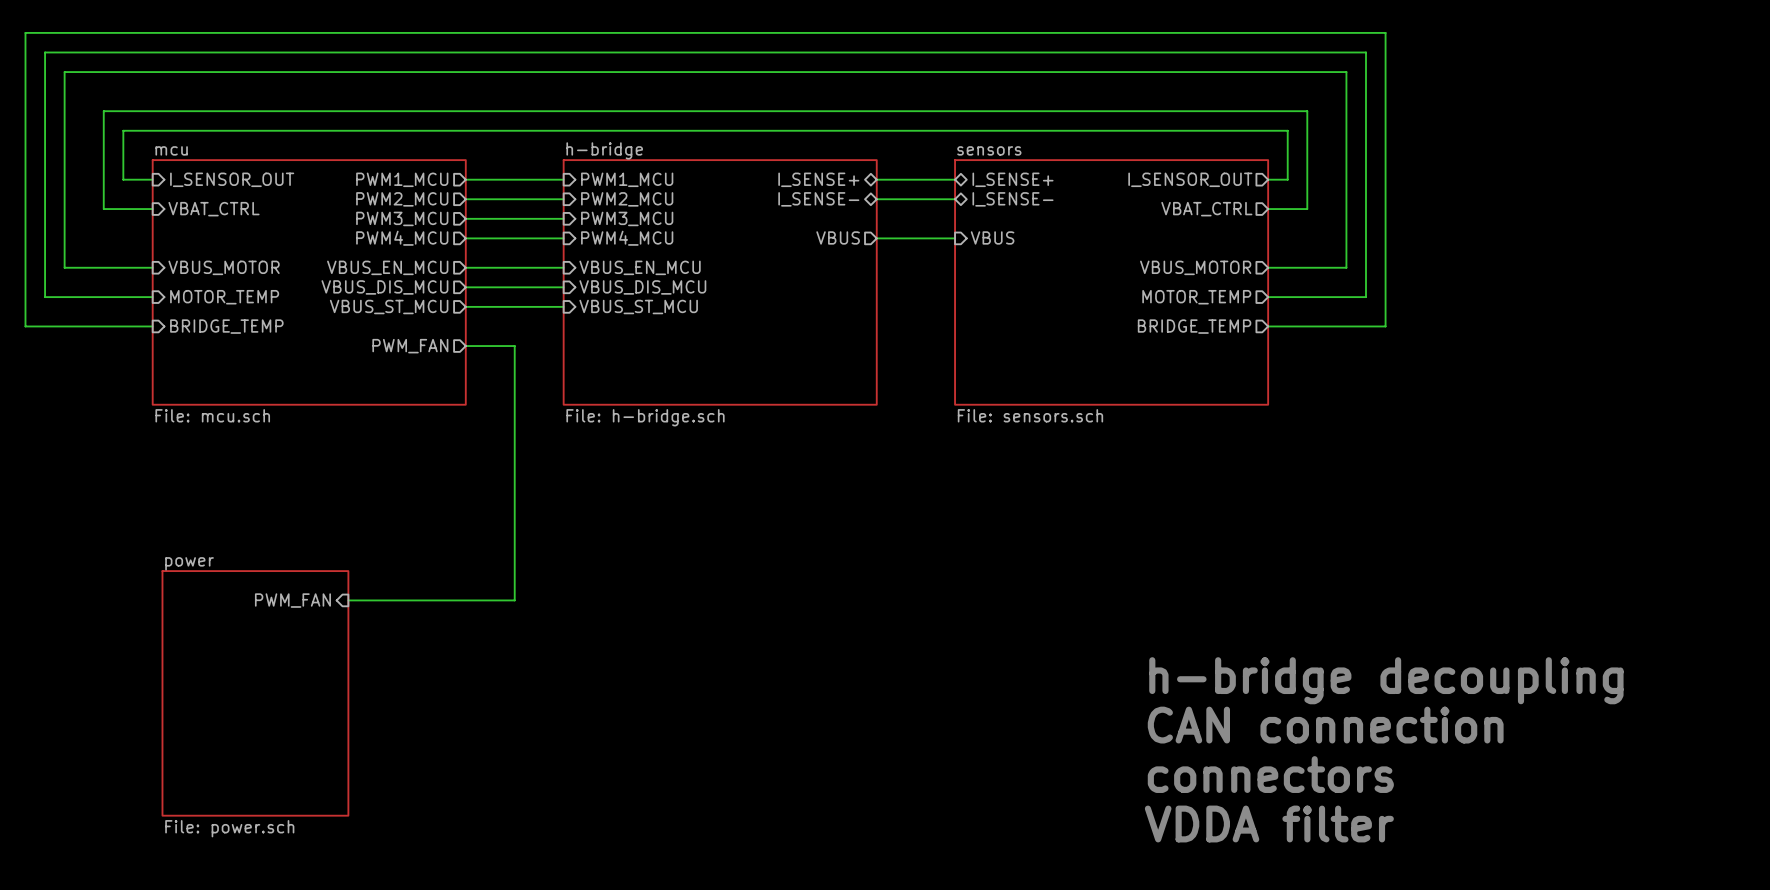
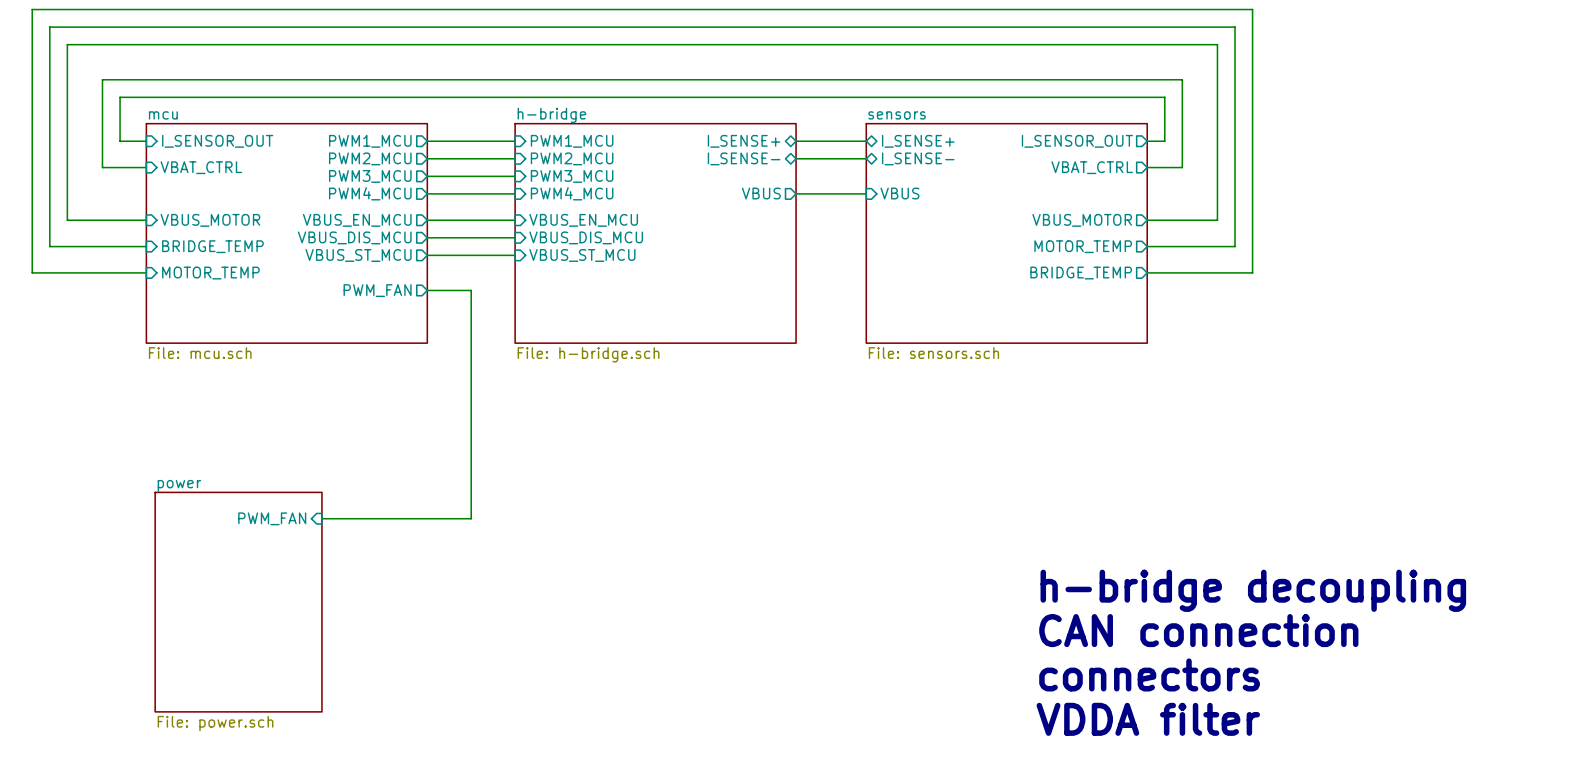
sheet pin: MOTOR_TEMP (224, 297) -> BRIDGE_TEMP (212, 246)
sheet pin: BRIDGE_TEMP (226, 326) -> MOTOR_TEMP (210, 273)

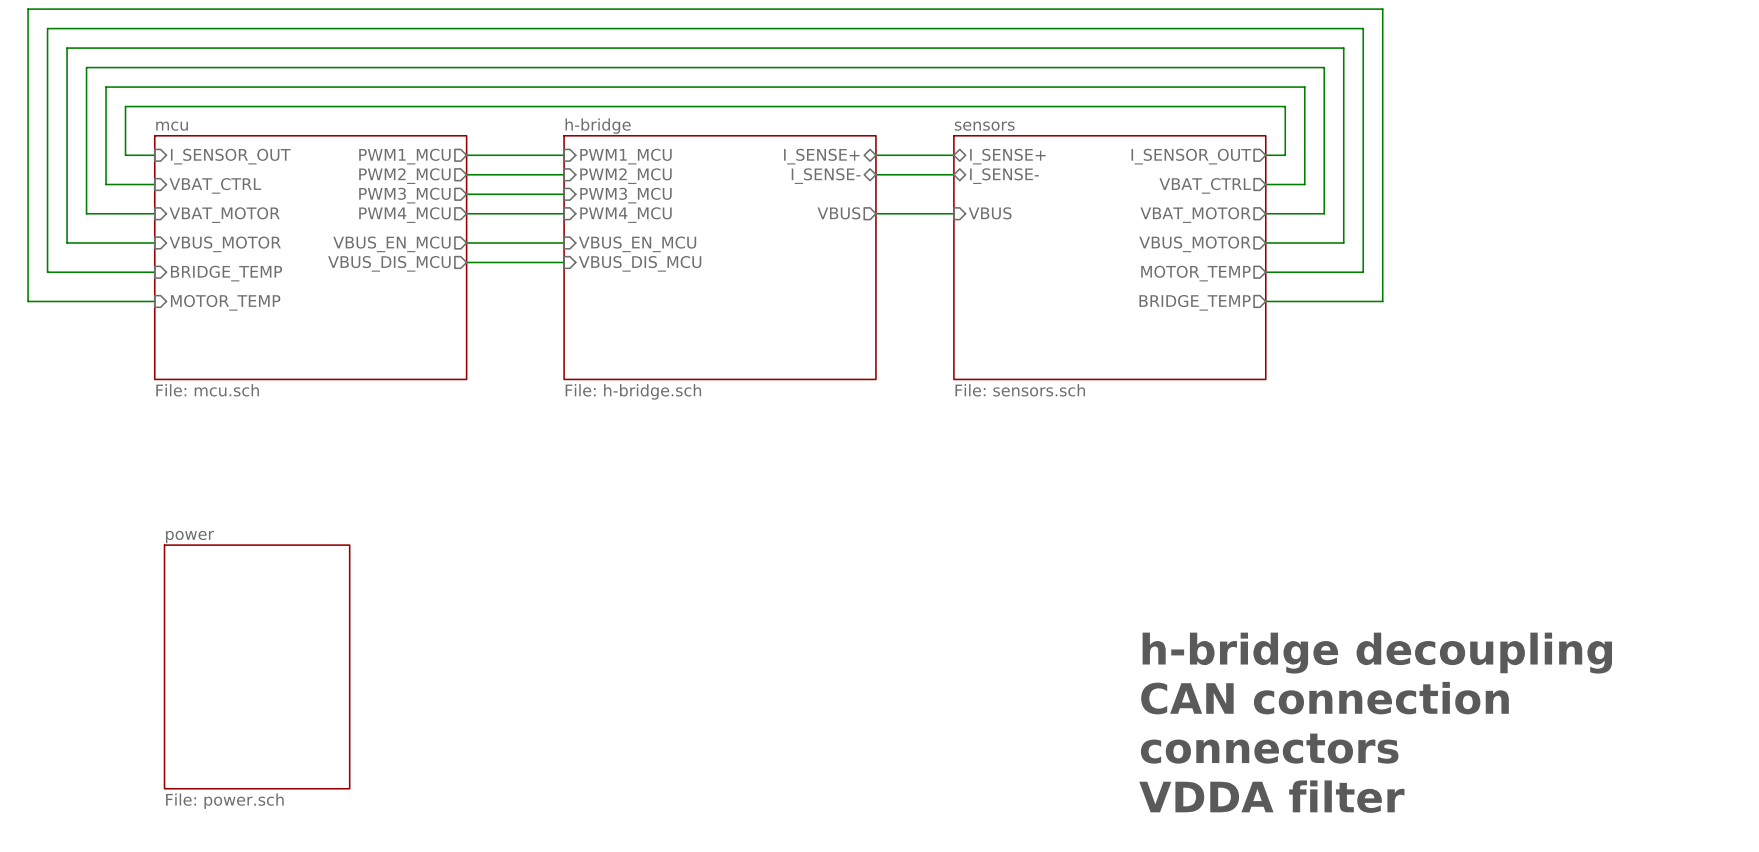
wire: none -> (154, 213) (86, 213) (86, 67) (1324, 67) (1324, 213) (1265, 213)
sheet pin: none -> VBAT_MOTOR (224, 215)
sheet pin: none -> VBAT_MOTOR (1195, 215)
sheet pin: VBUS_ST_MCU (358, 255) -> none
wire: (427, 255) (515, 255) -> none
sheet pin: VBUS_ST_MCU (582, 255) -> none
sheet pin: PWM_FAN (377, 290) -> none
wire: (427, 290) (471, 290) (471, 518) (321, 518) -> none
sheet pin: PWM_FAN (272, 518) -> none

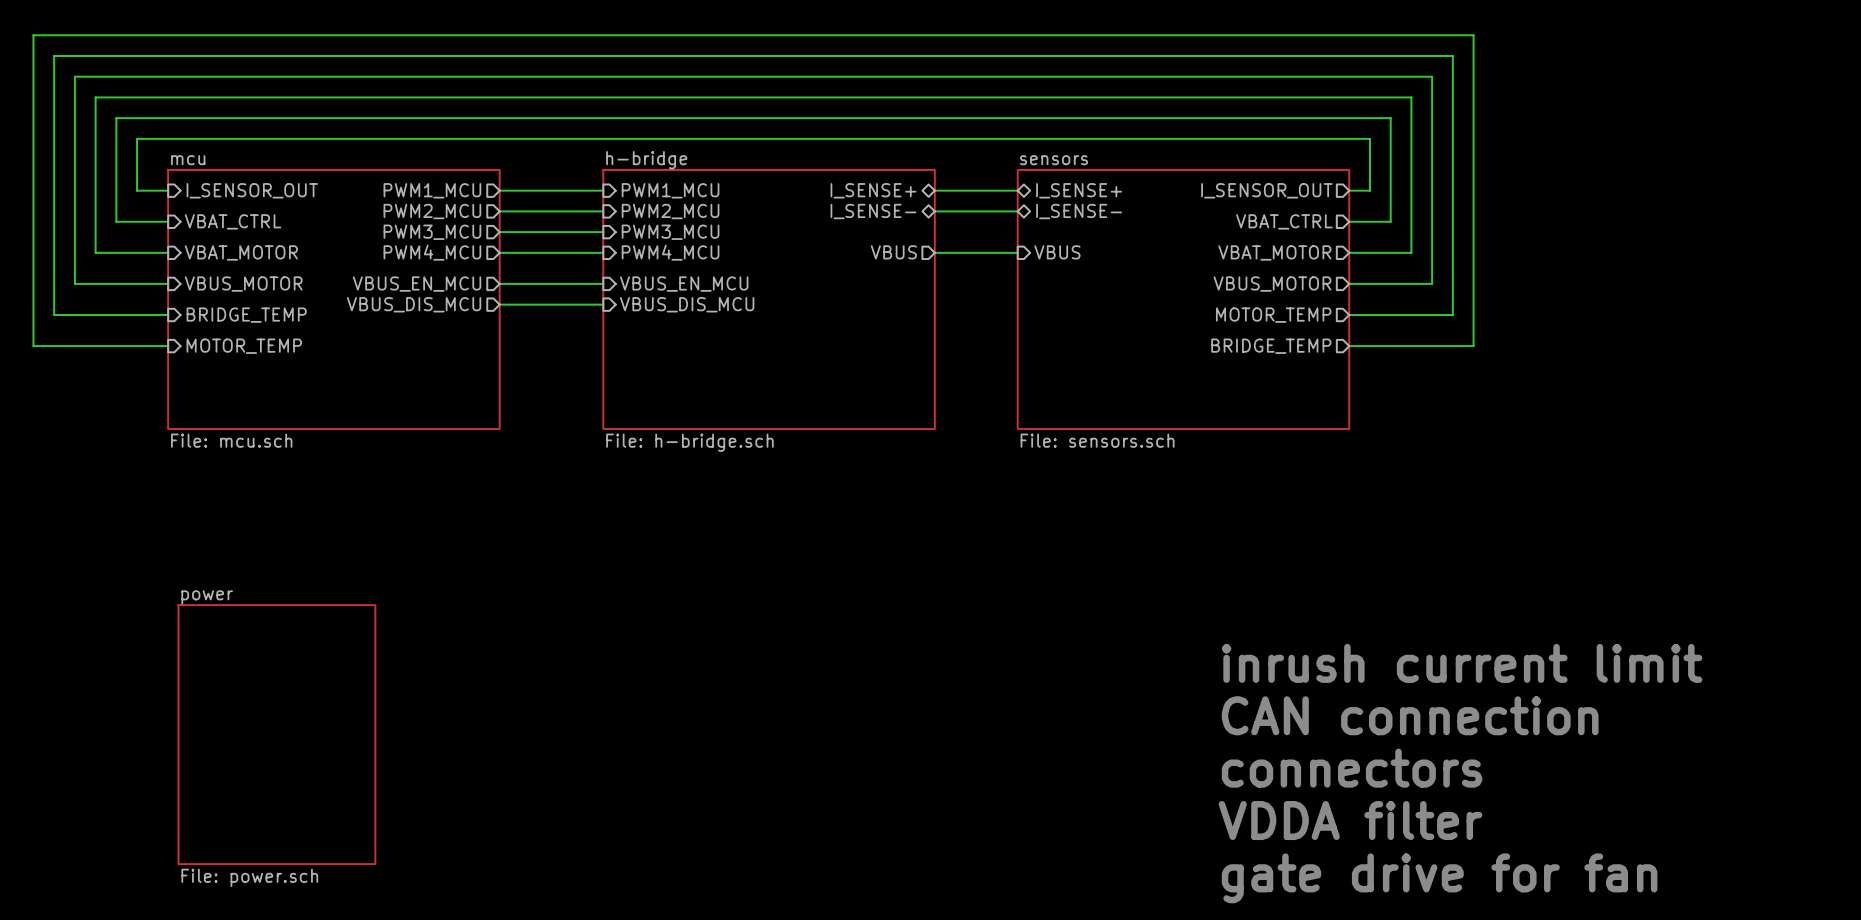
text: none -> inrush current limit (1462, 663)
text: h-bridge decoupling (1377, 653) -> CAN connection (1410, 715)
text: CAN connection (1325, 698) -> connectors (1352, 768)
text: connectors (1269, 748) -> VDDA filter (1350, 820)
text: VDDA filter (1271, 796) -> gate drive for fan (1439, 878)

